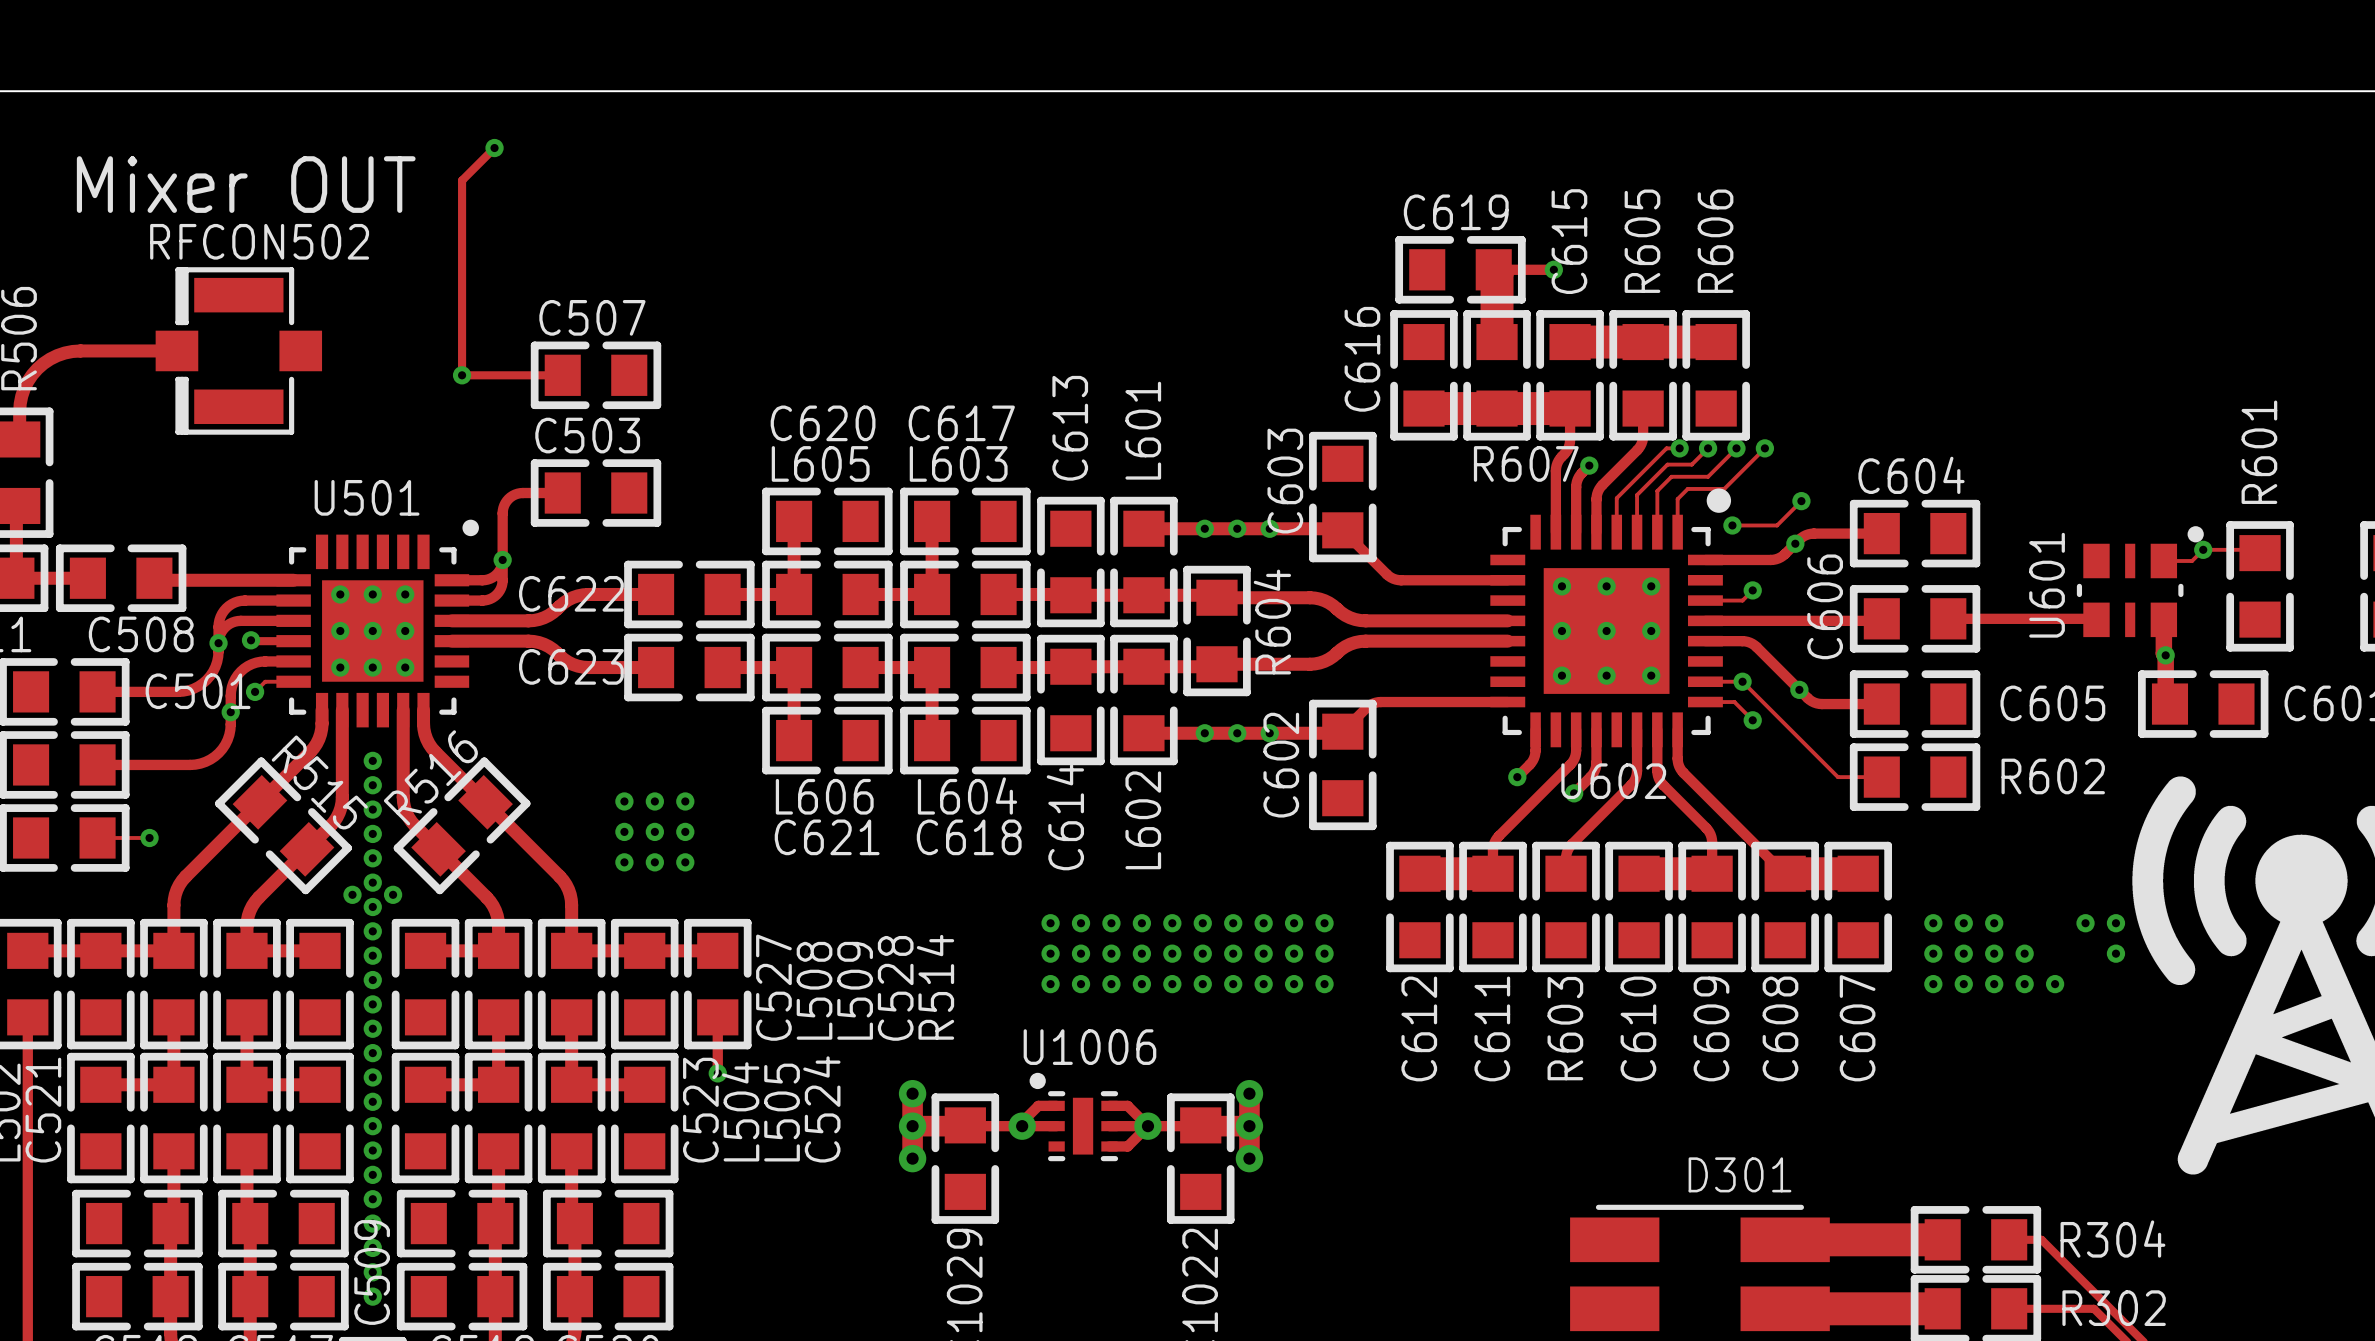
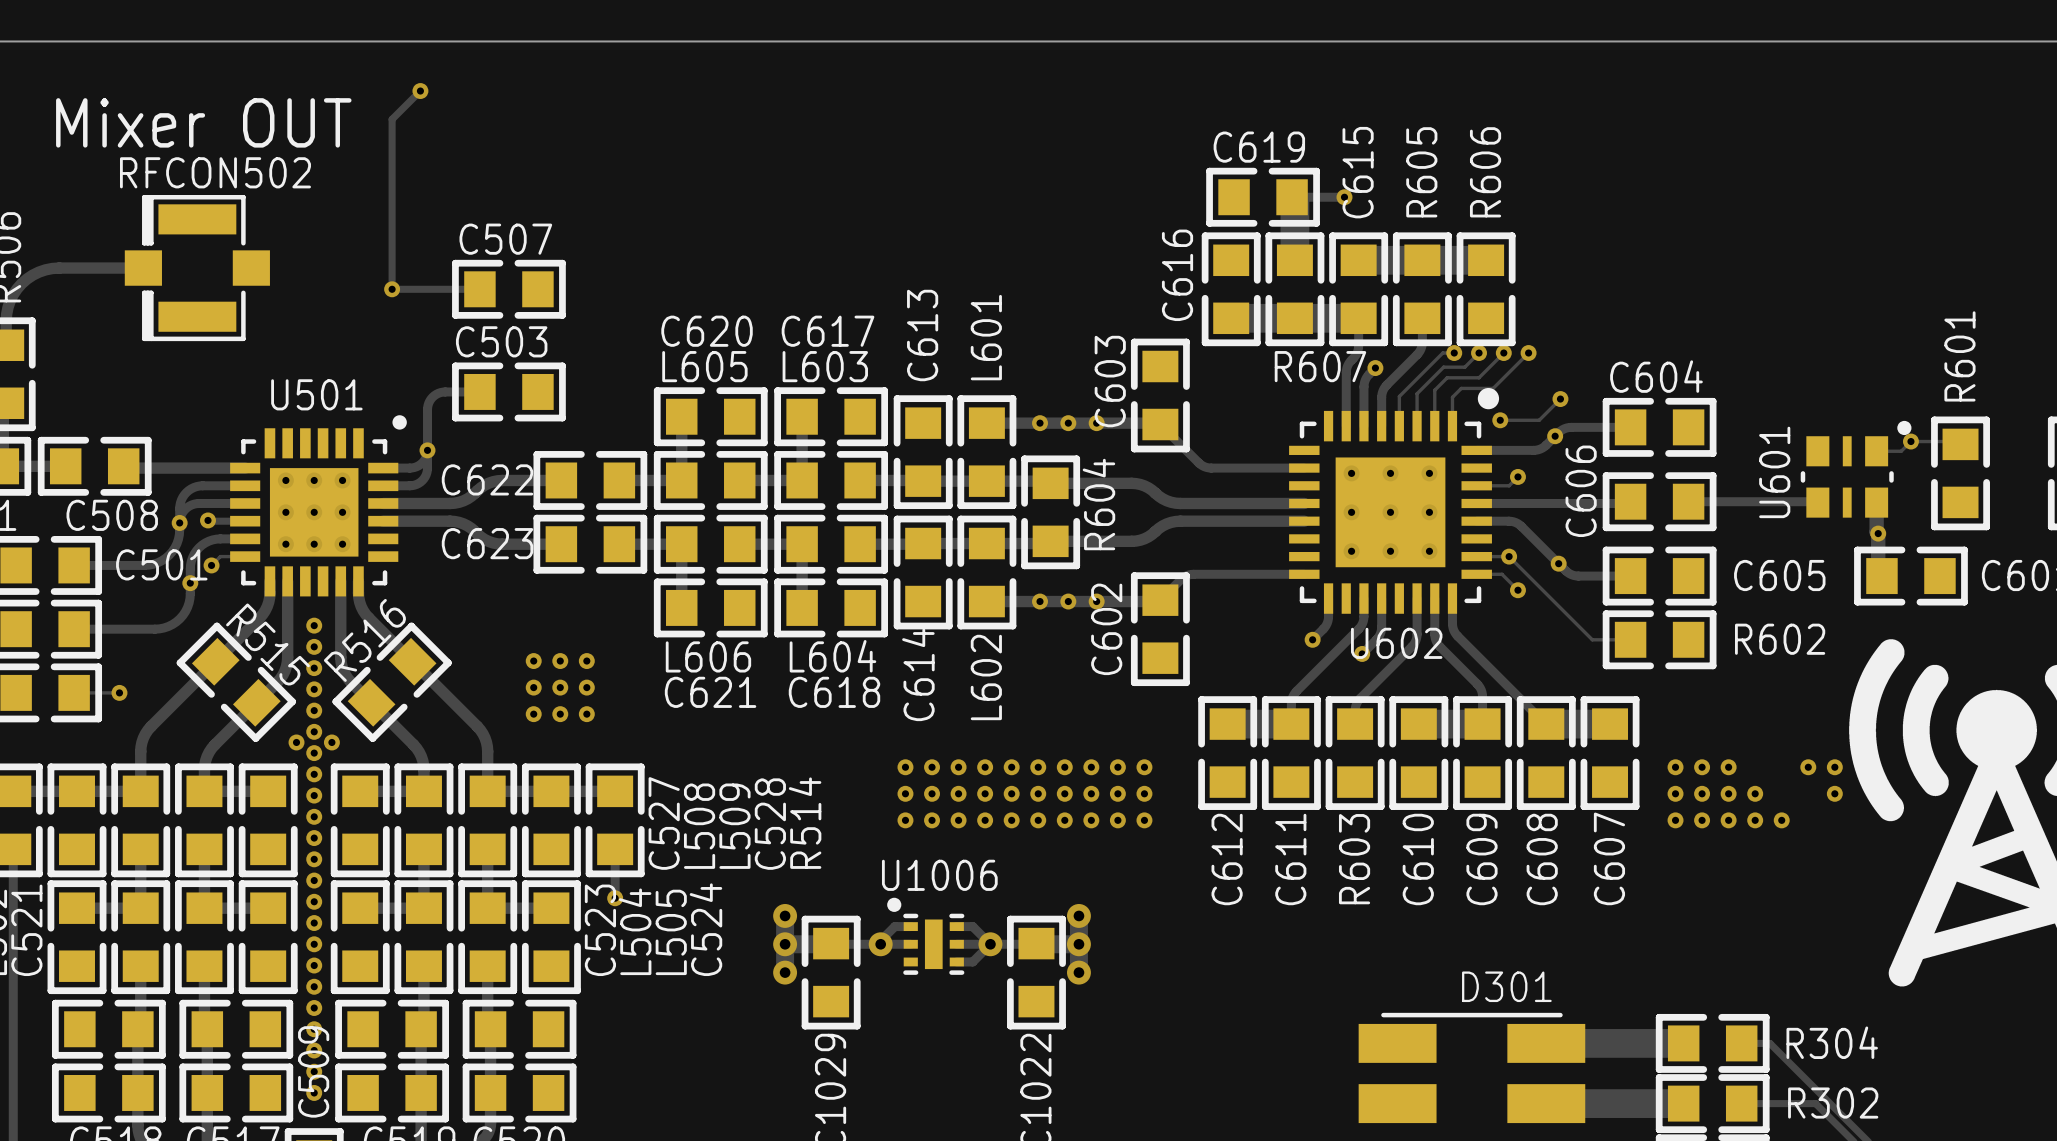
U501 name position: U501 (367, 497) -> U501 (316, 394)

